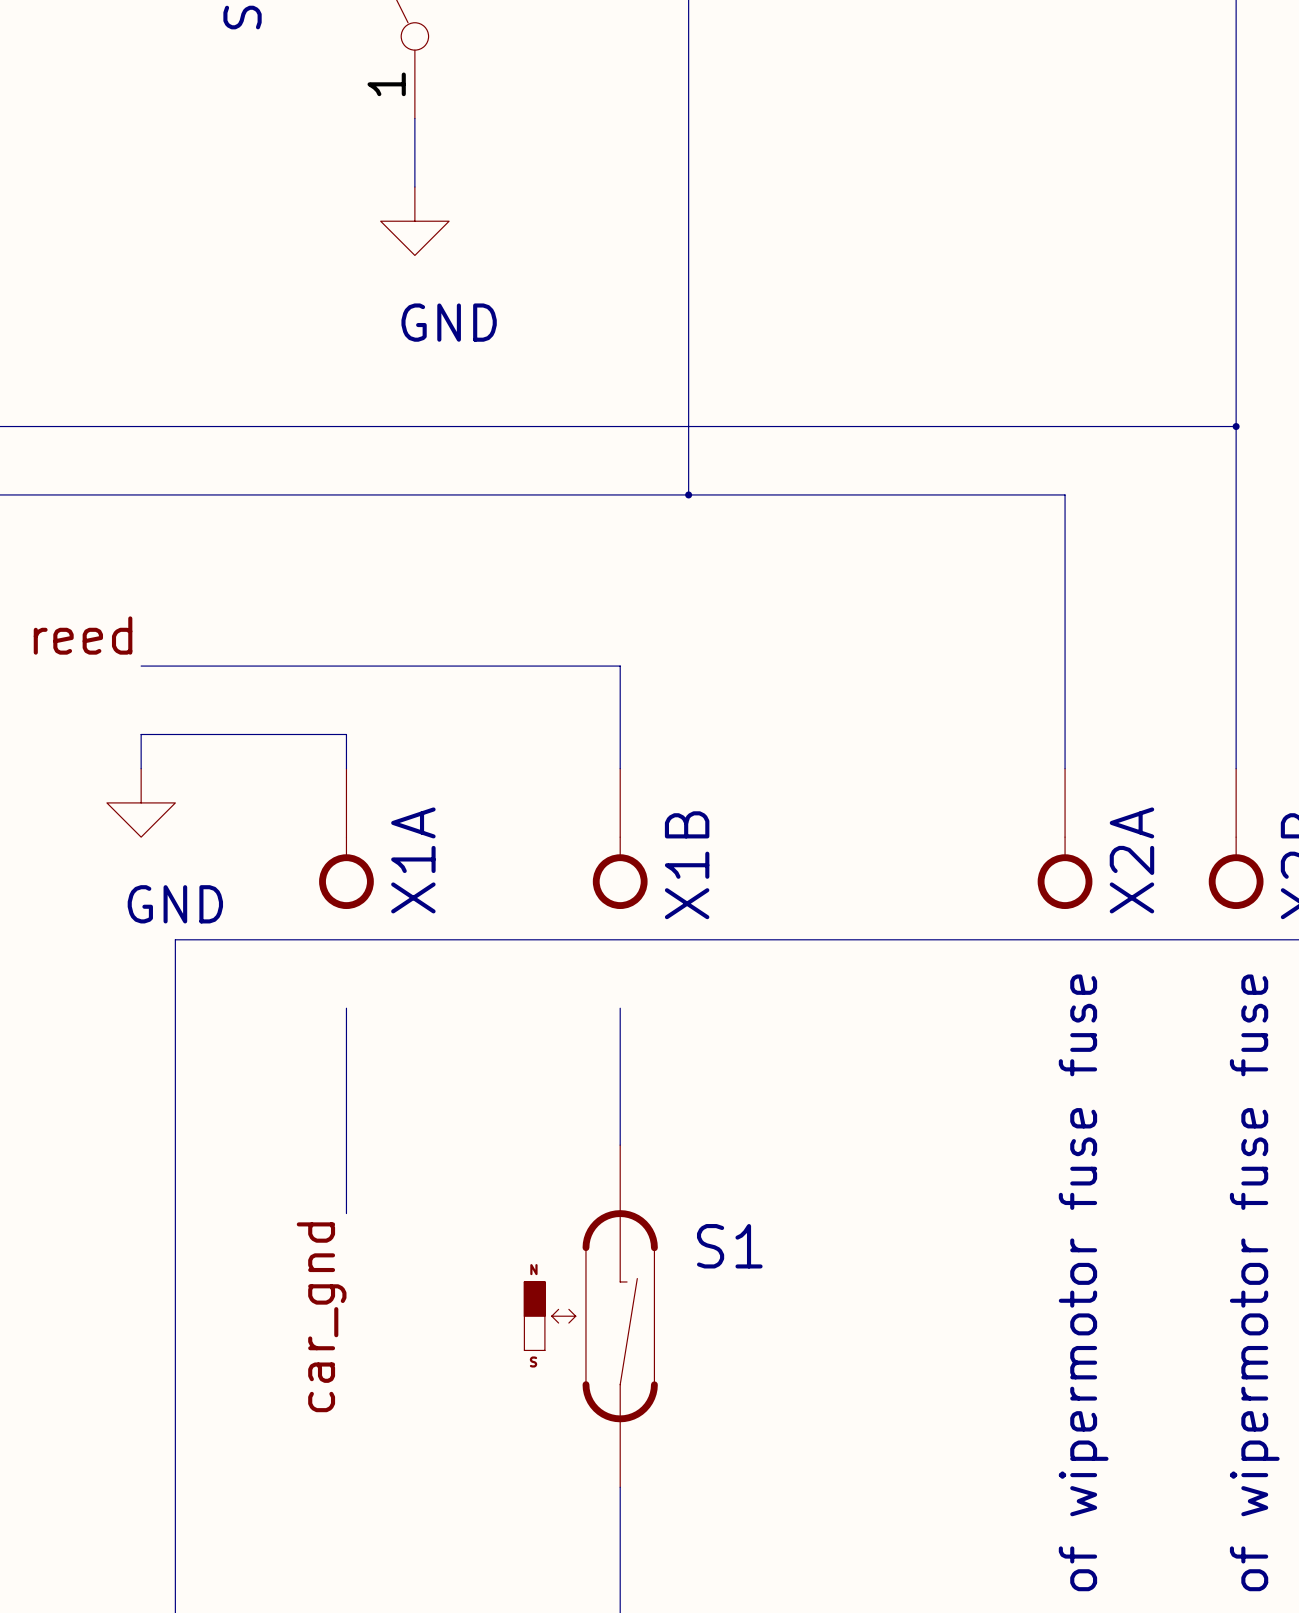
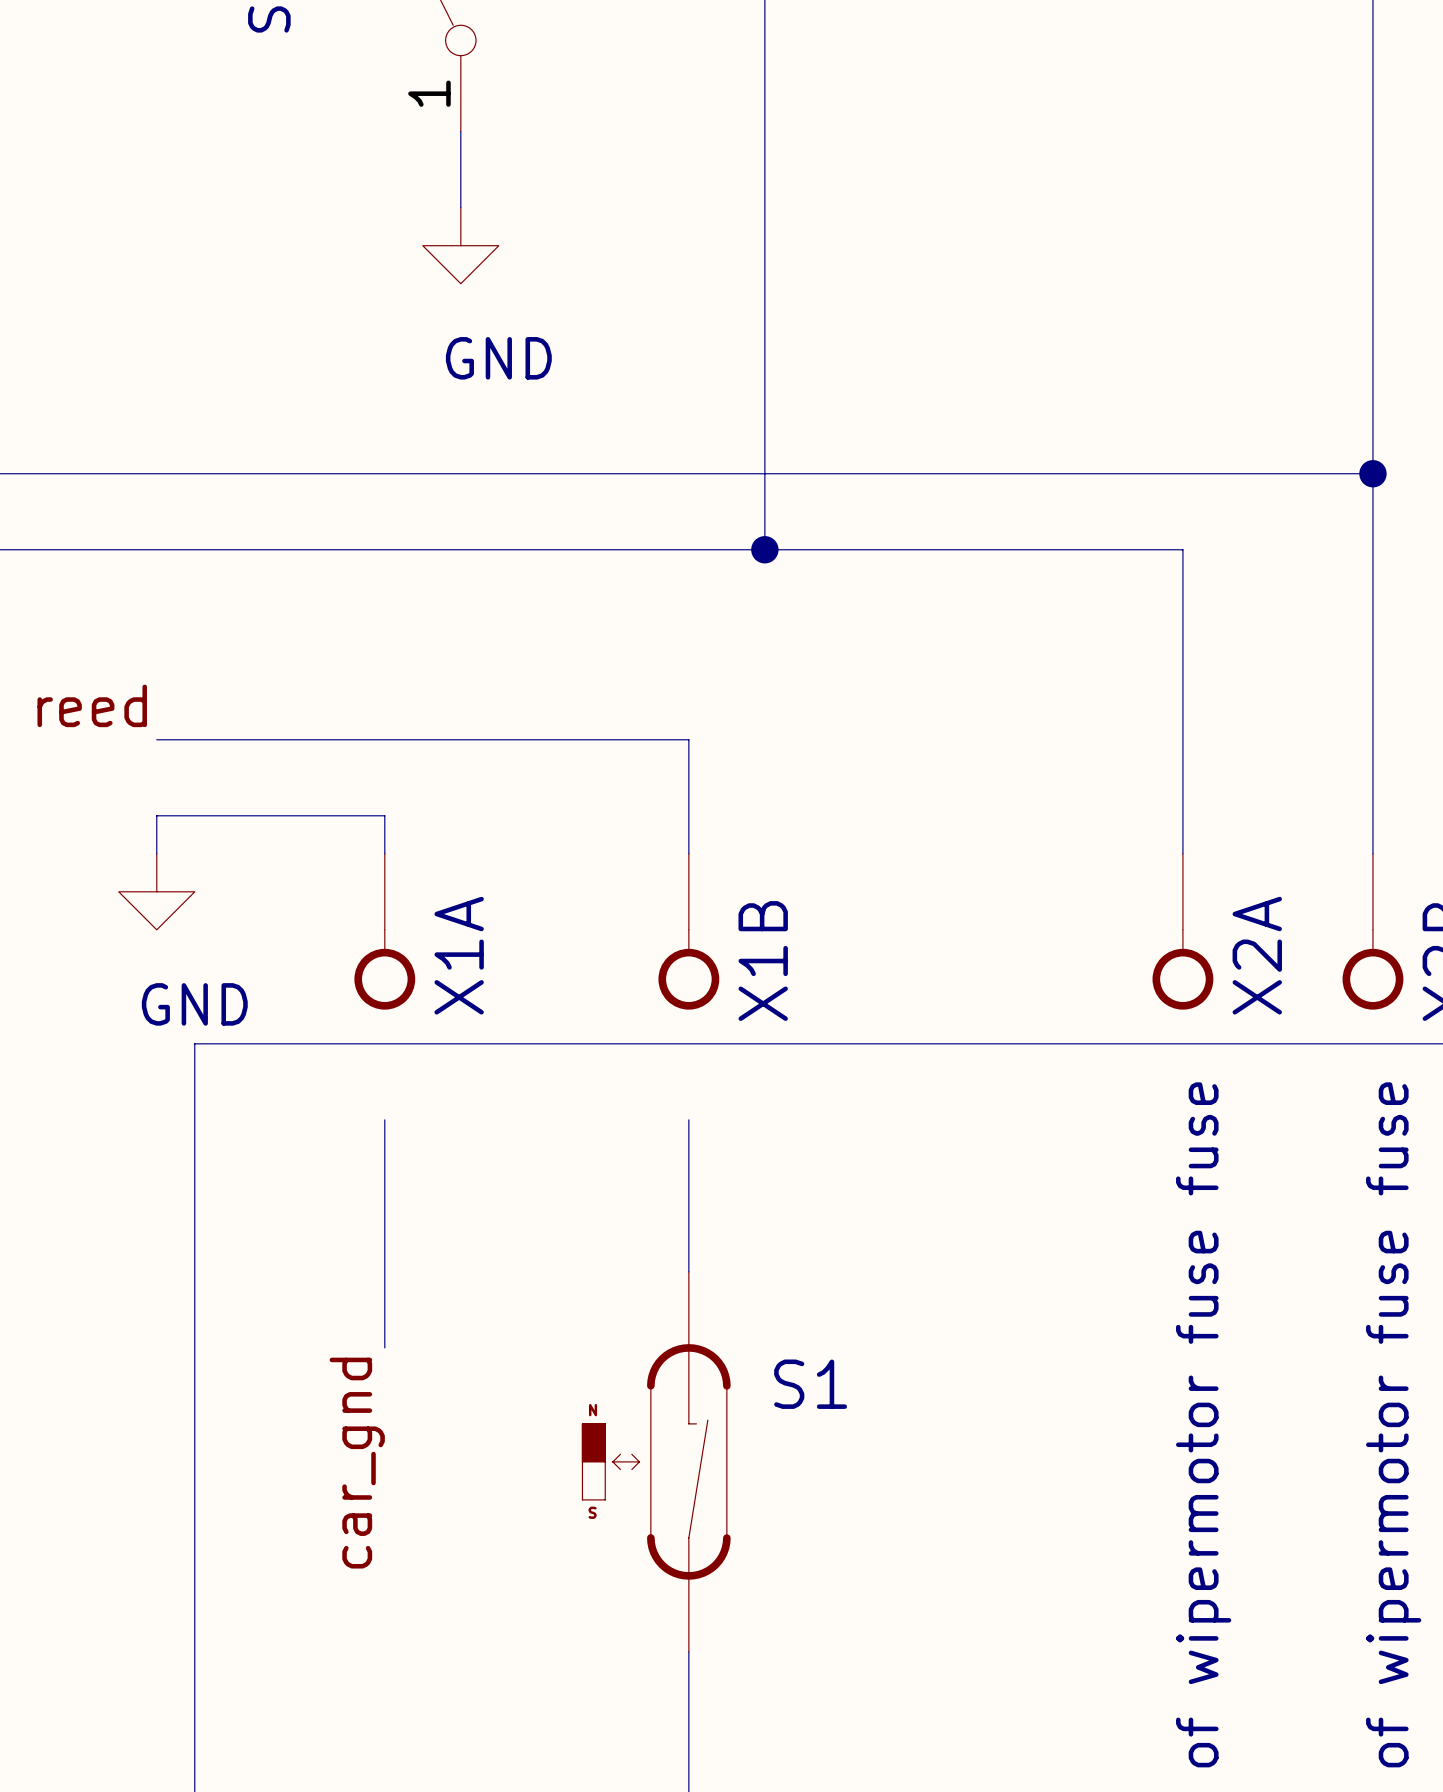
junction size: [1232, 423, 1240, 431] -> [1359, 460, 1387, 488]
junction size: [685, 491, 693, 499] -> [751, 536, 779, 564]

